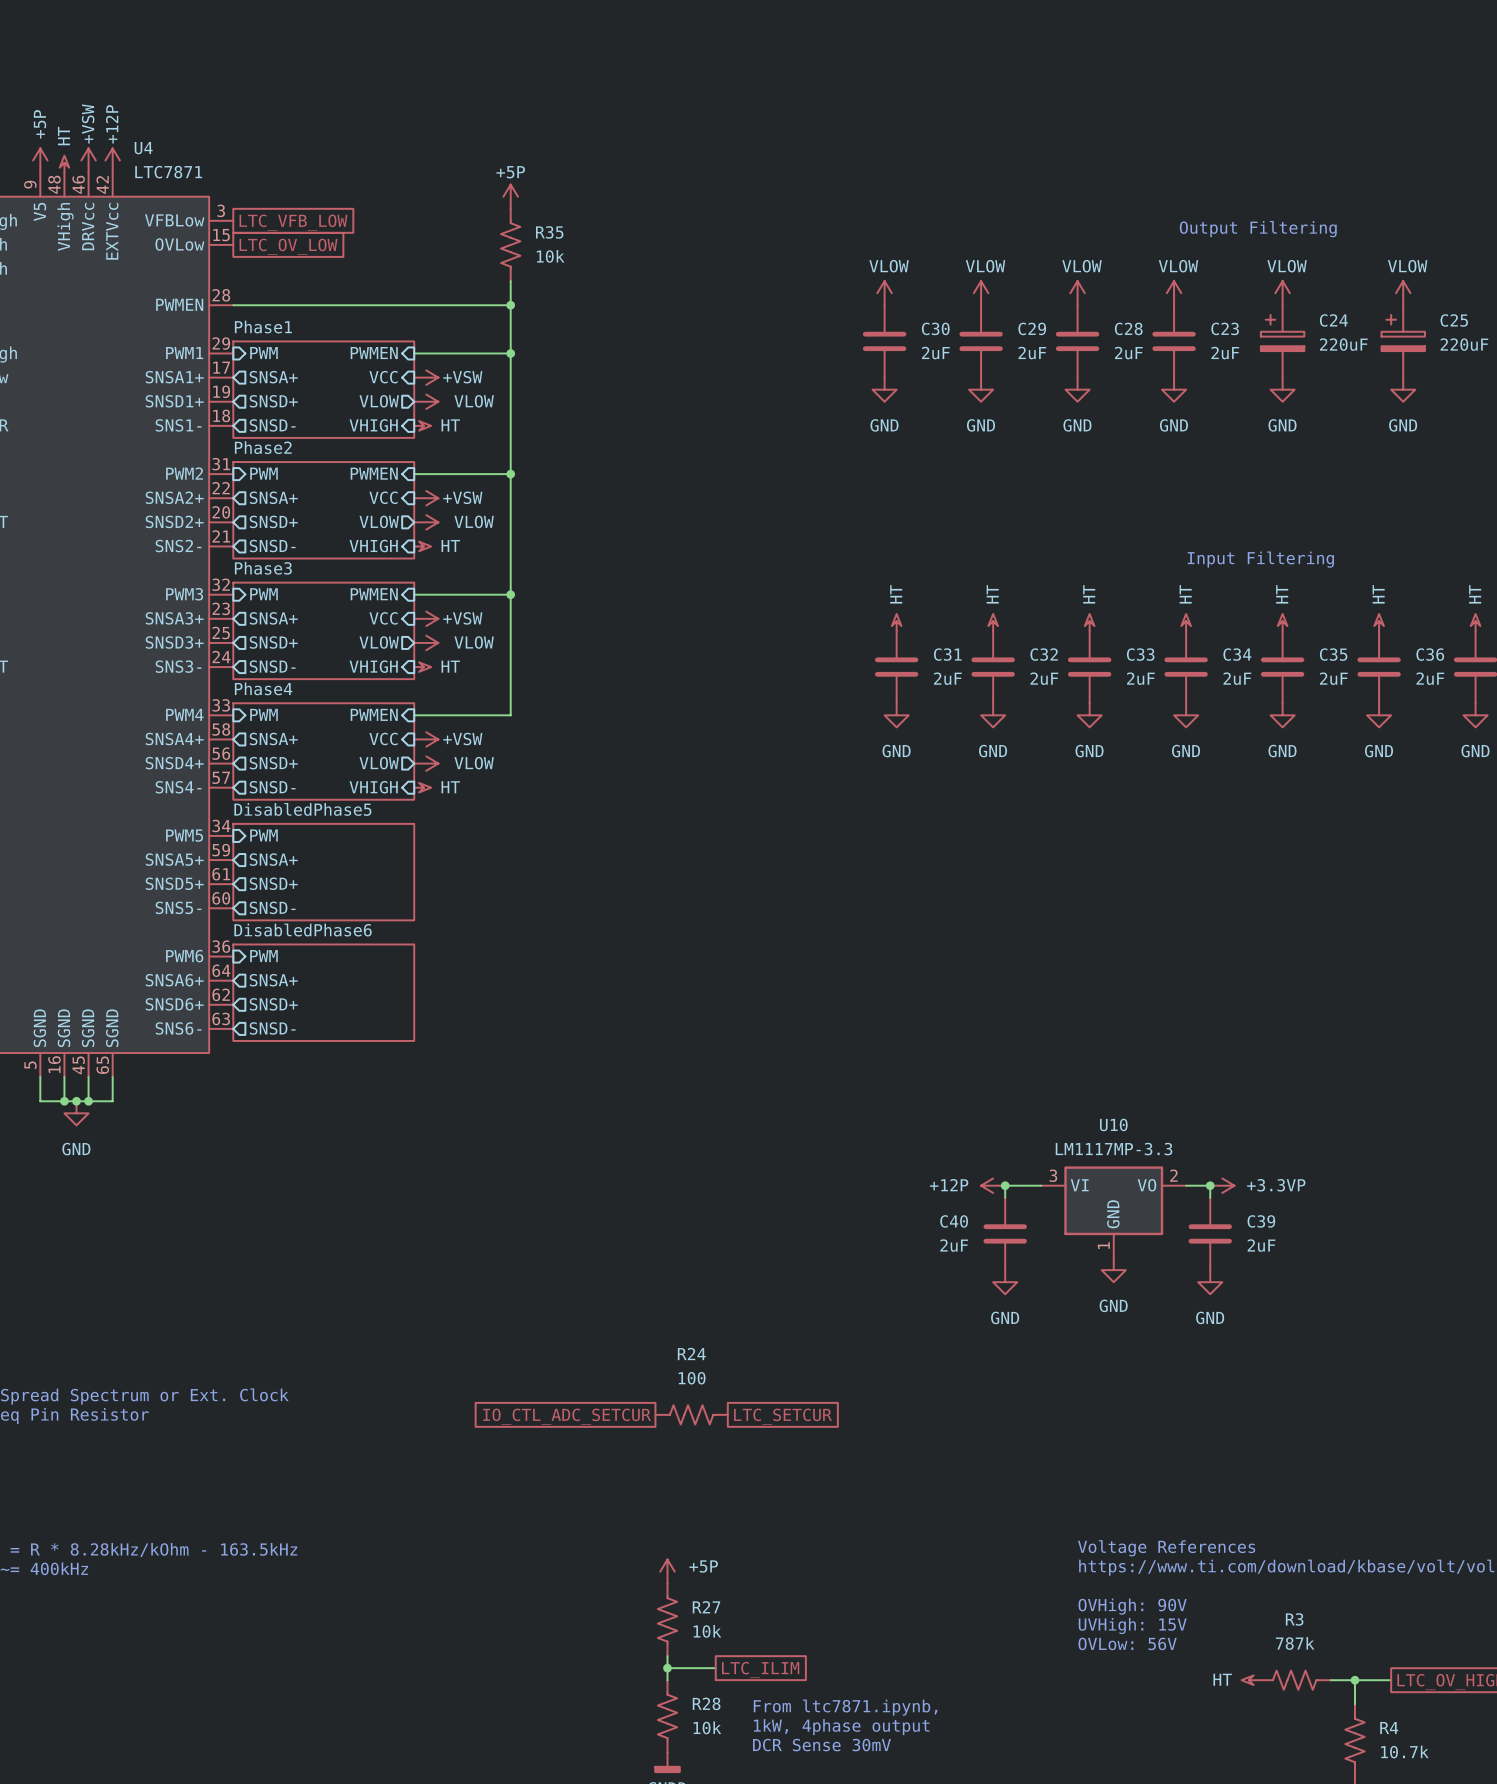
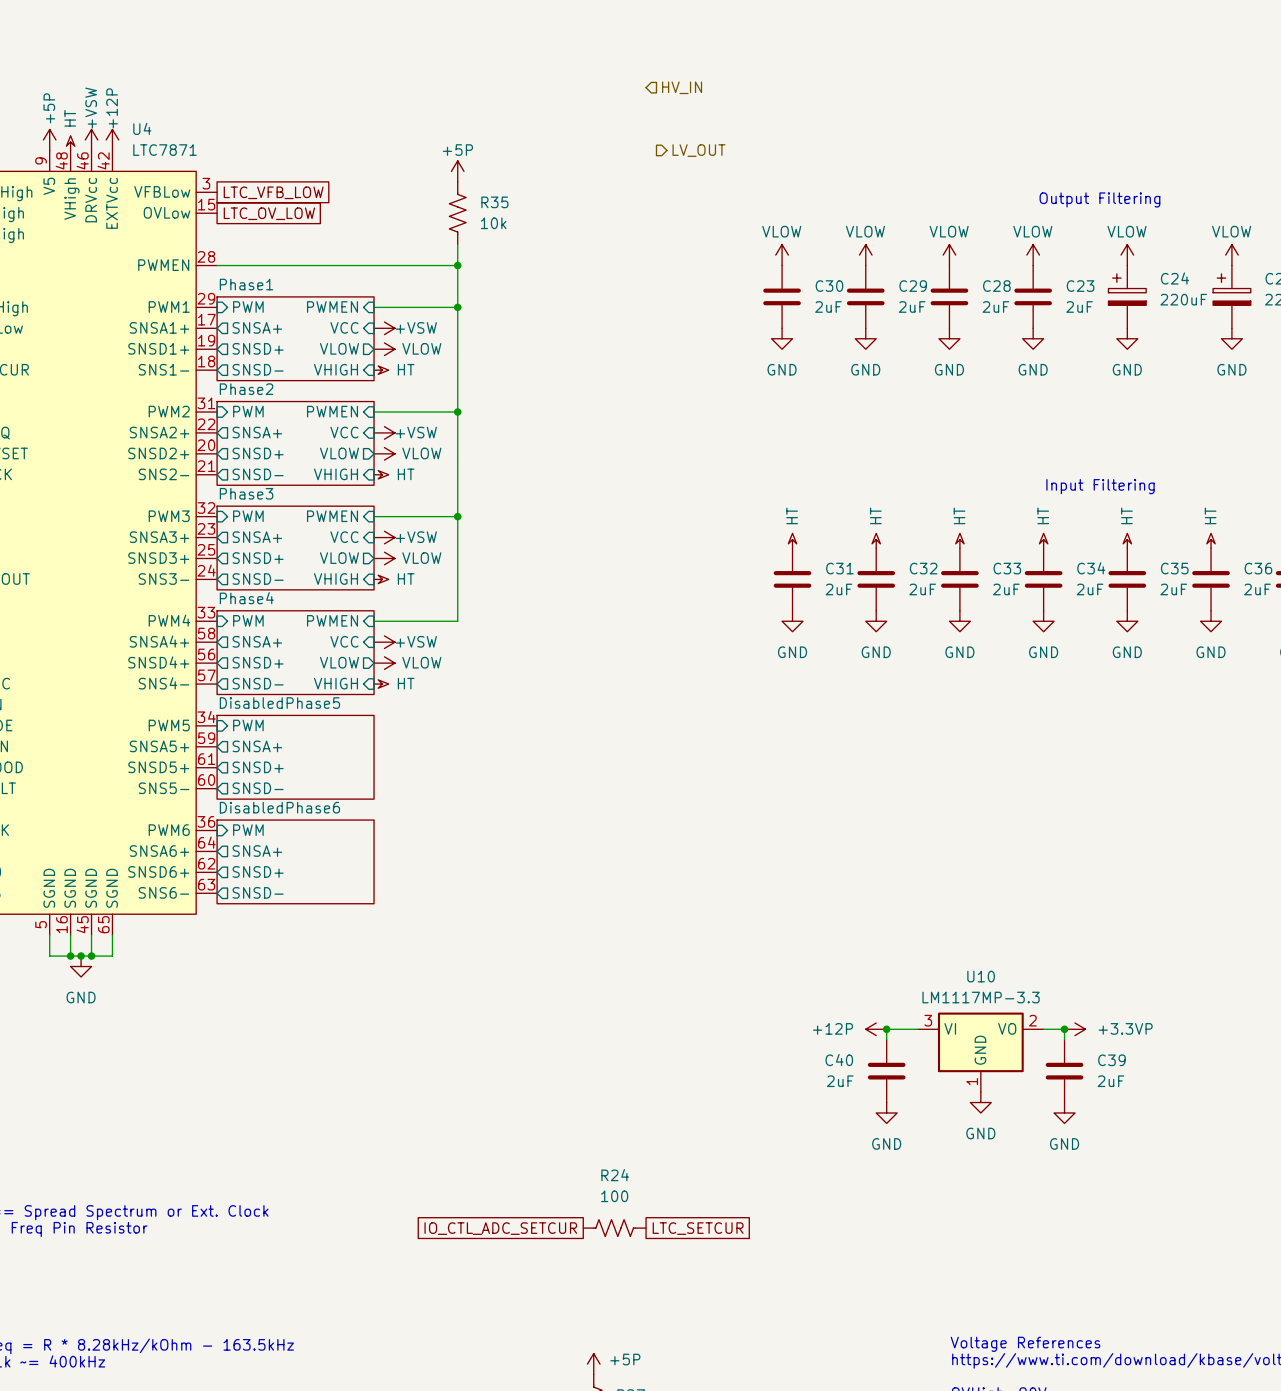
hierarchical label: none -> HV_IN (682, 87)
hierarchical label: none -> LV_OUT (699, 150)

